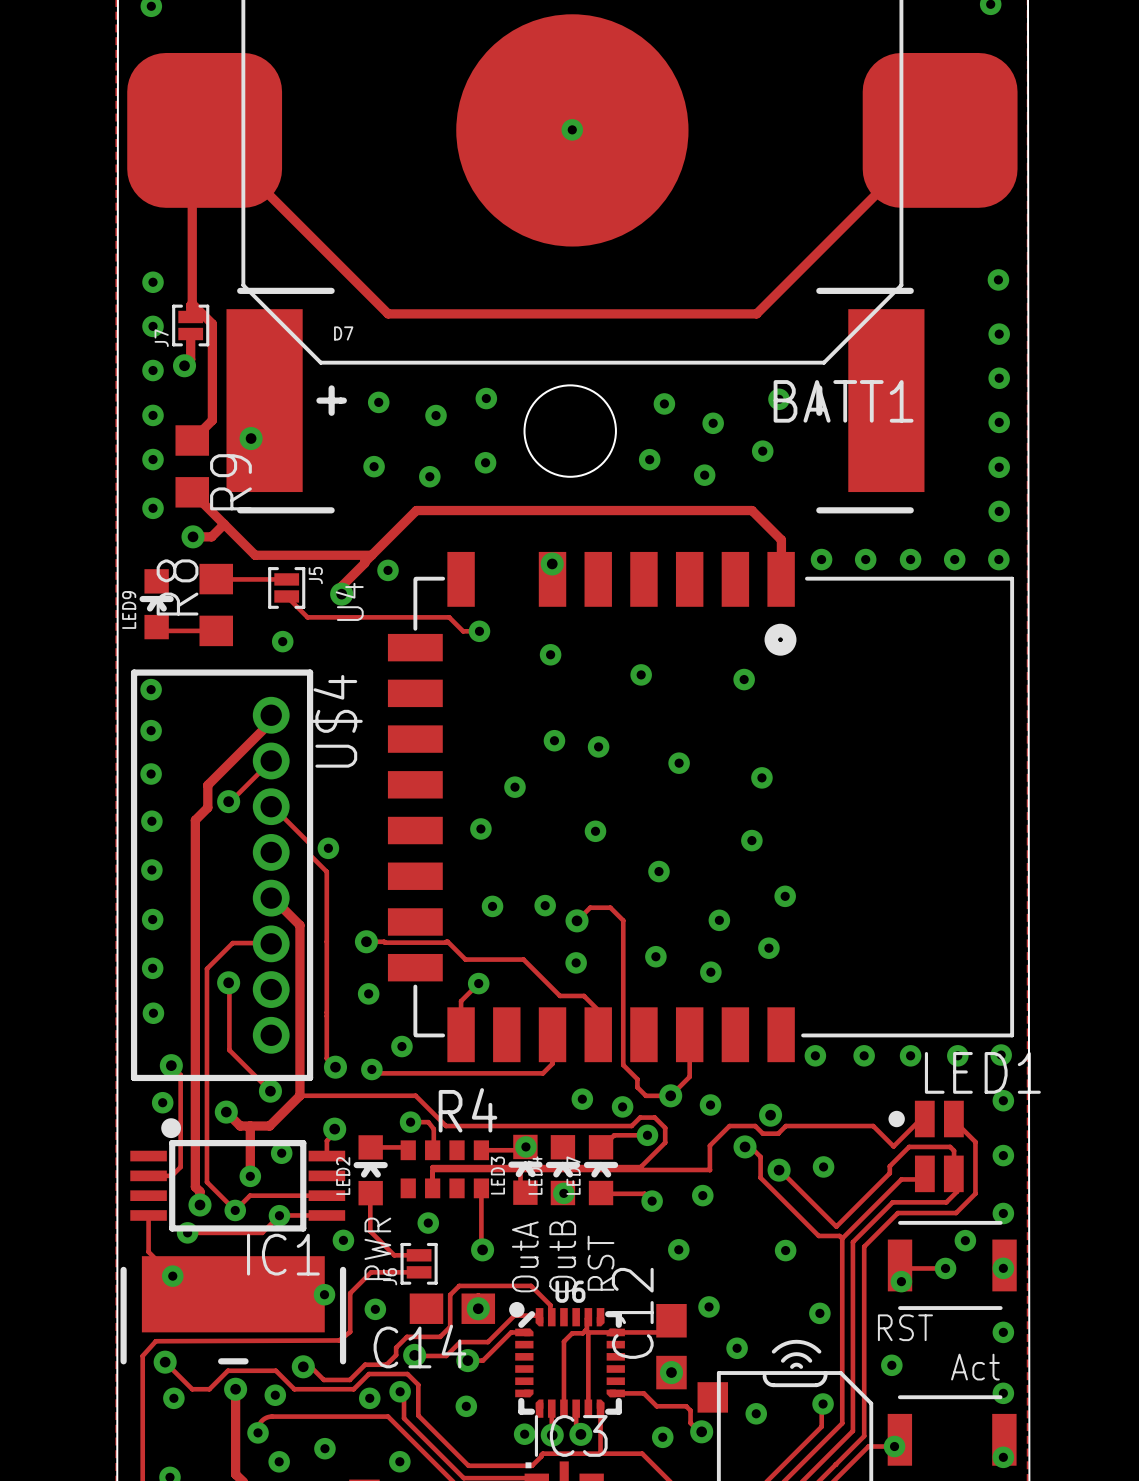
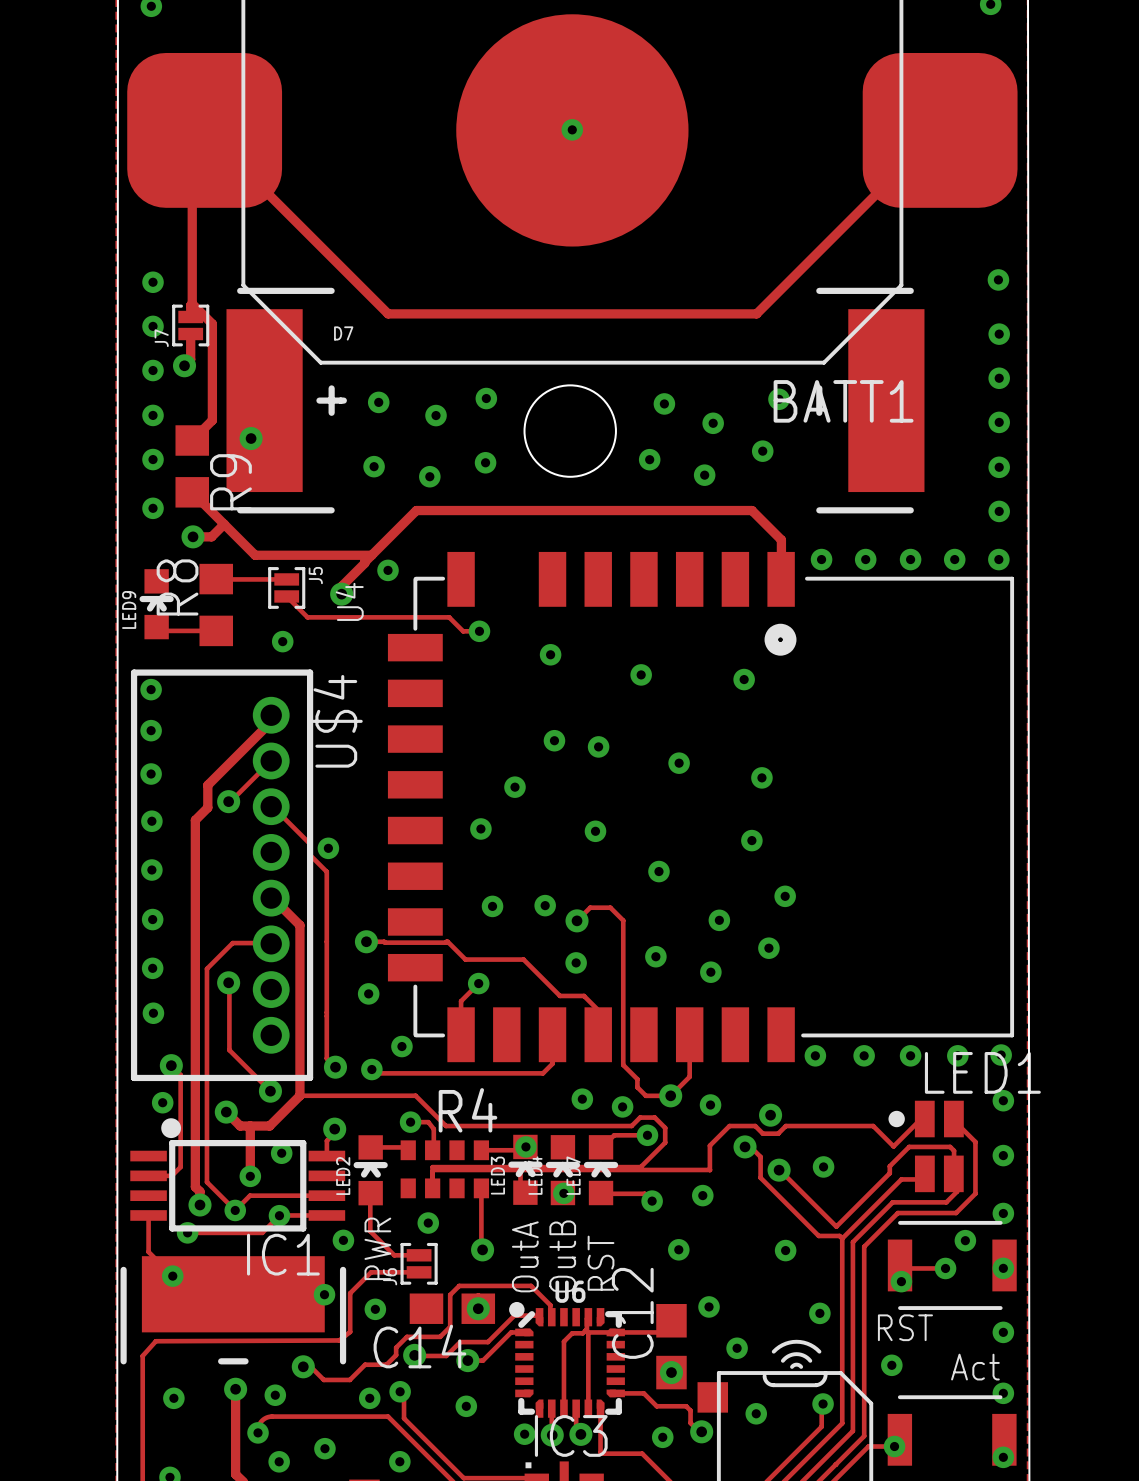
via: (552, 563) -> none
track: (165, 1362) (192, 1389) (209, 1389) (227, 1370) (275, 1370) (294, 1389) (353, 1389) (368, 1374) (407, 1374) (418, 1384) (418, 1415) (468, 1465) (532, 1465) (542, 1453) (601, 1453) -> none
via: (165, 1362) -> none

